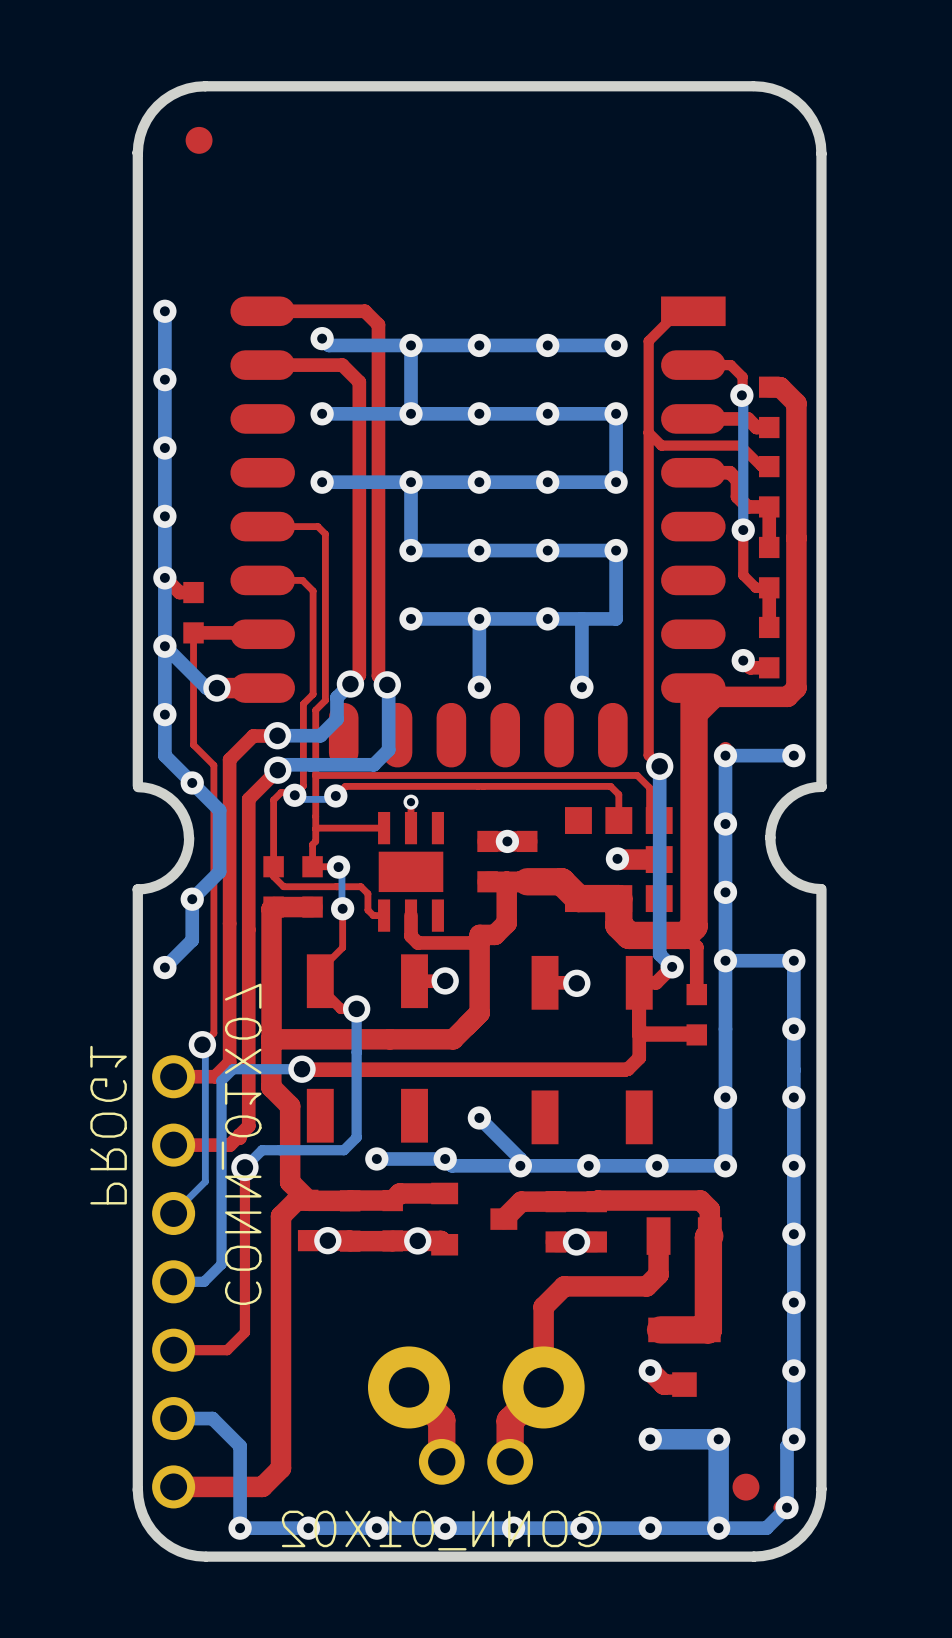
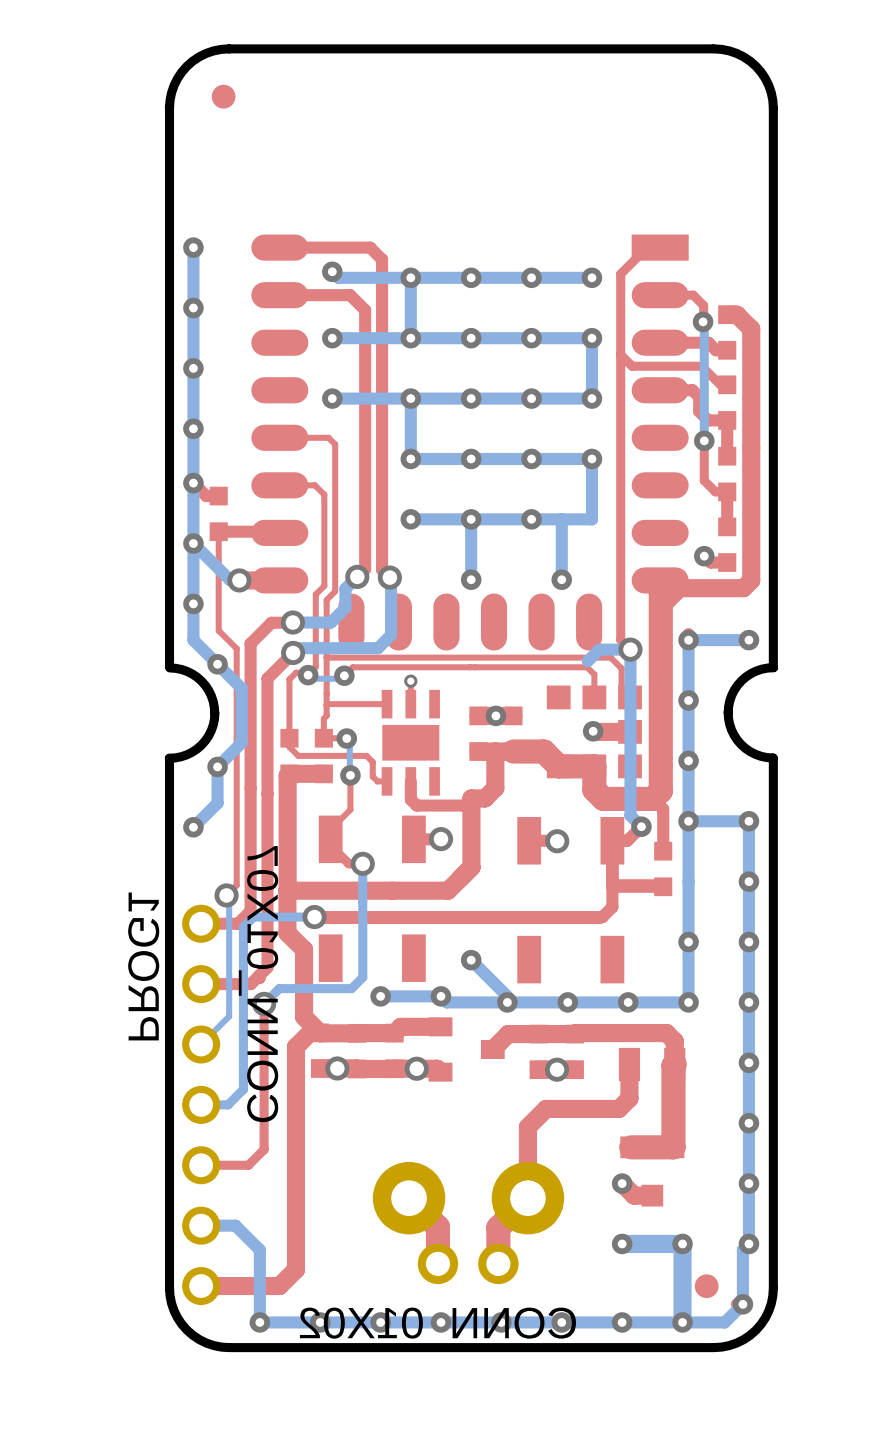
bottom track: none -> (630, 649) (599, 649) (587, 661)

